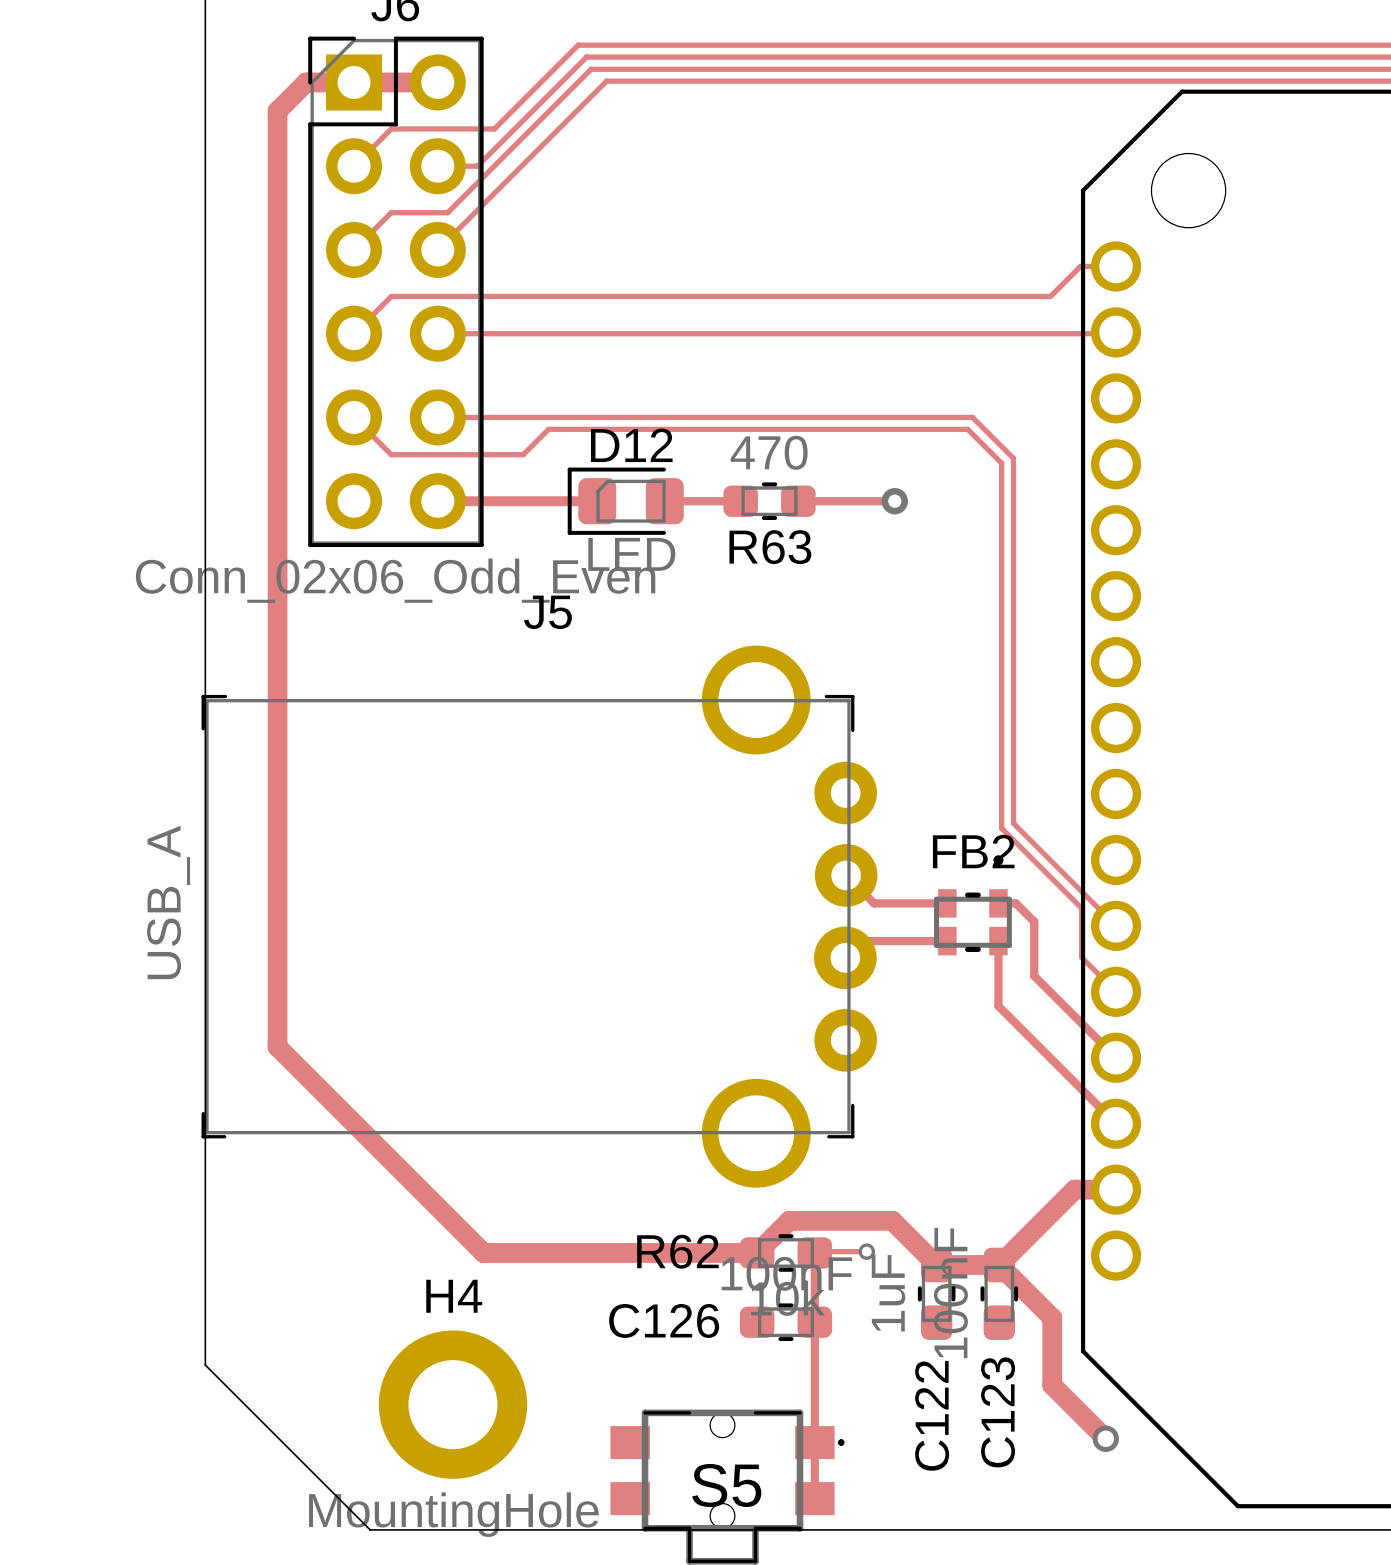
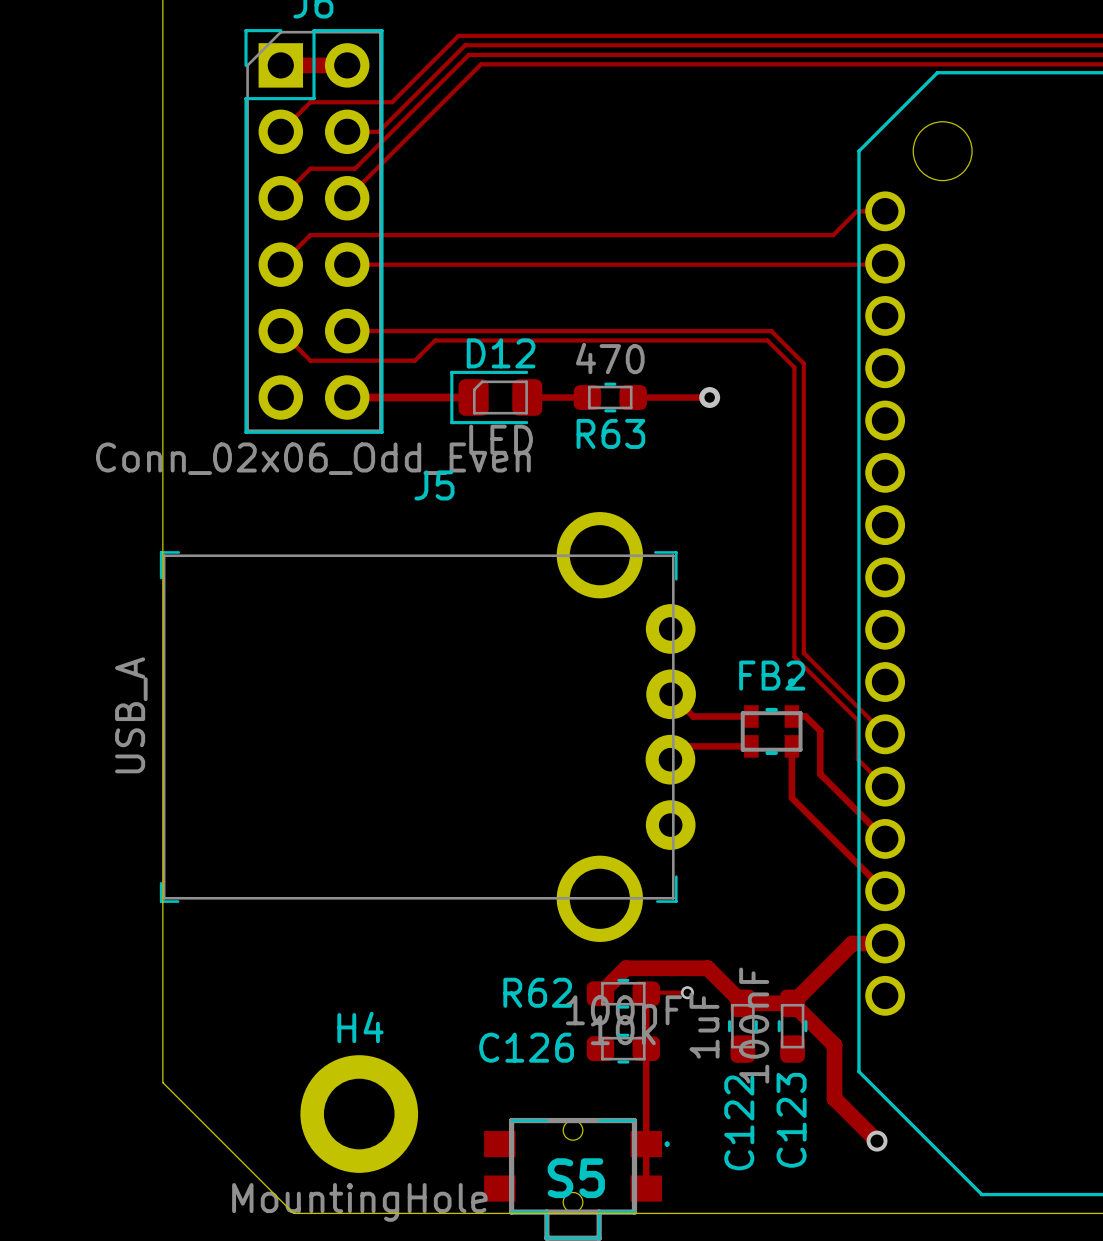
track: (354, 82) (306, 82) (277, 111) (277, 1046) (483, 1252) (757, 1252) -> none

